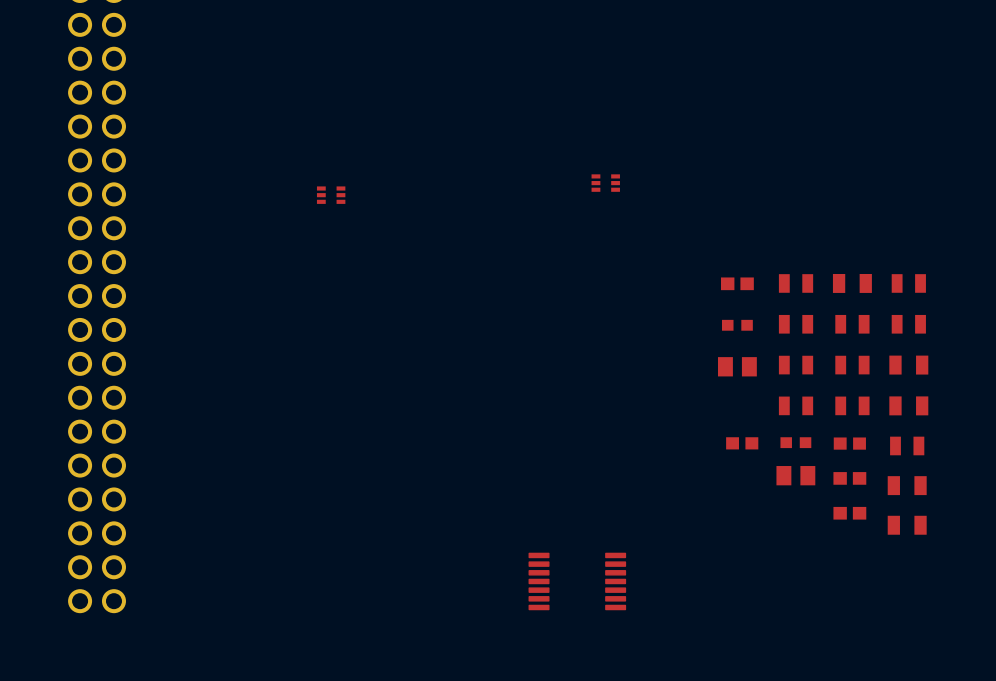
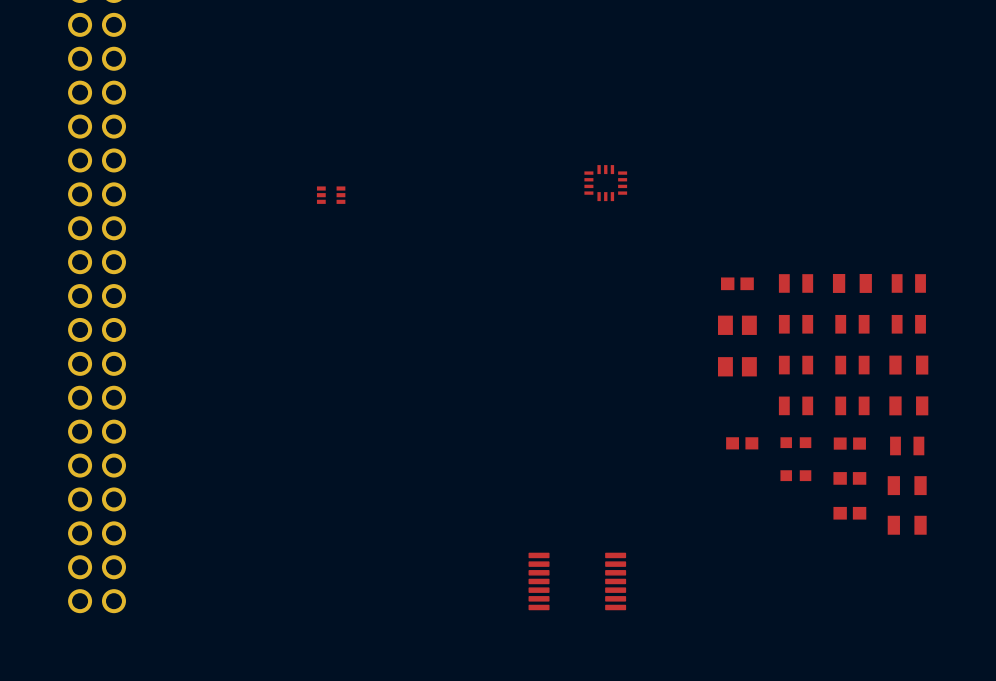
part footprint: [591, 174, 620, 192] -> [584, 165, 628, 202]
part footprint: [721, 319, 753, 331] -> [717, 315, 757, 335]
part footprint: [776, 466, 816, 486] -> [780, 470, 812, 482]

